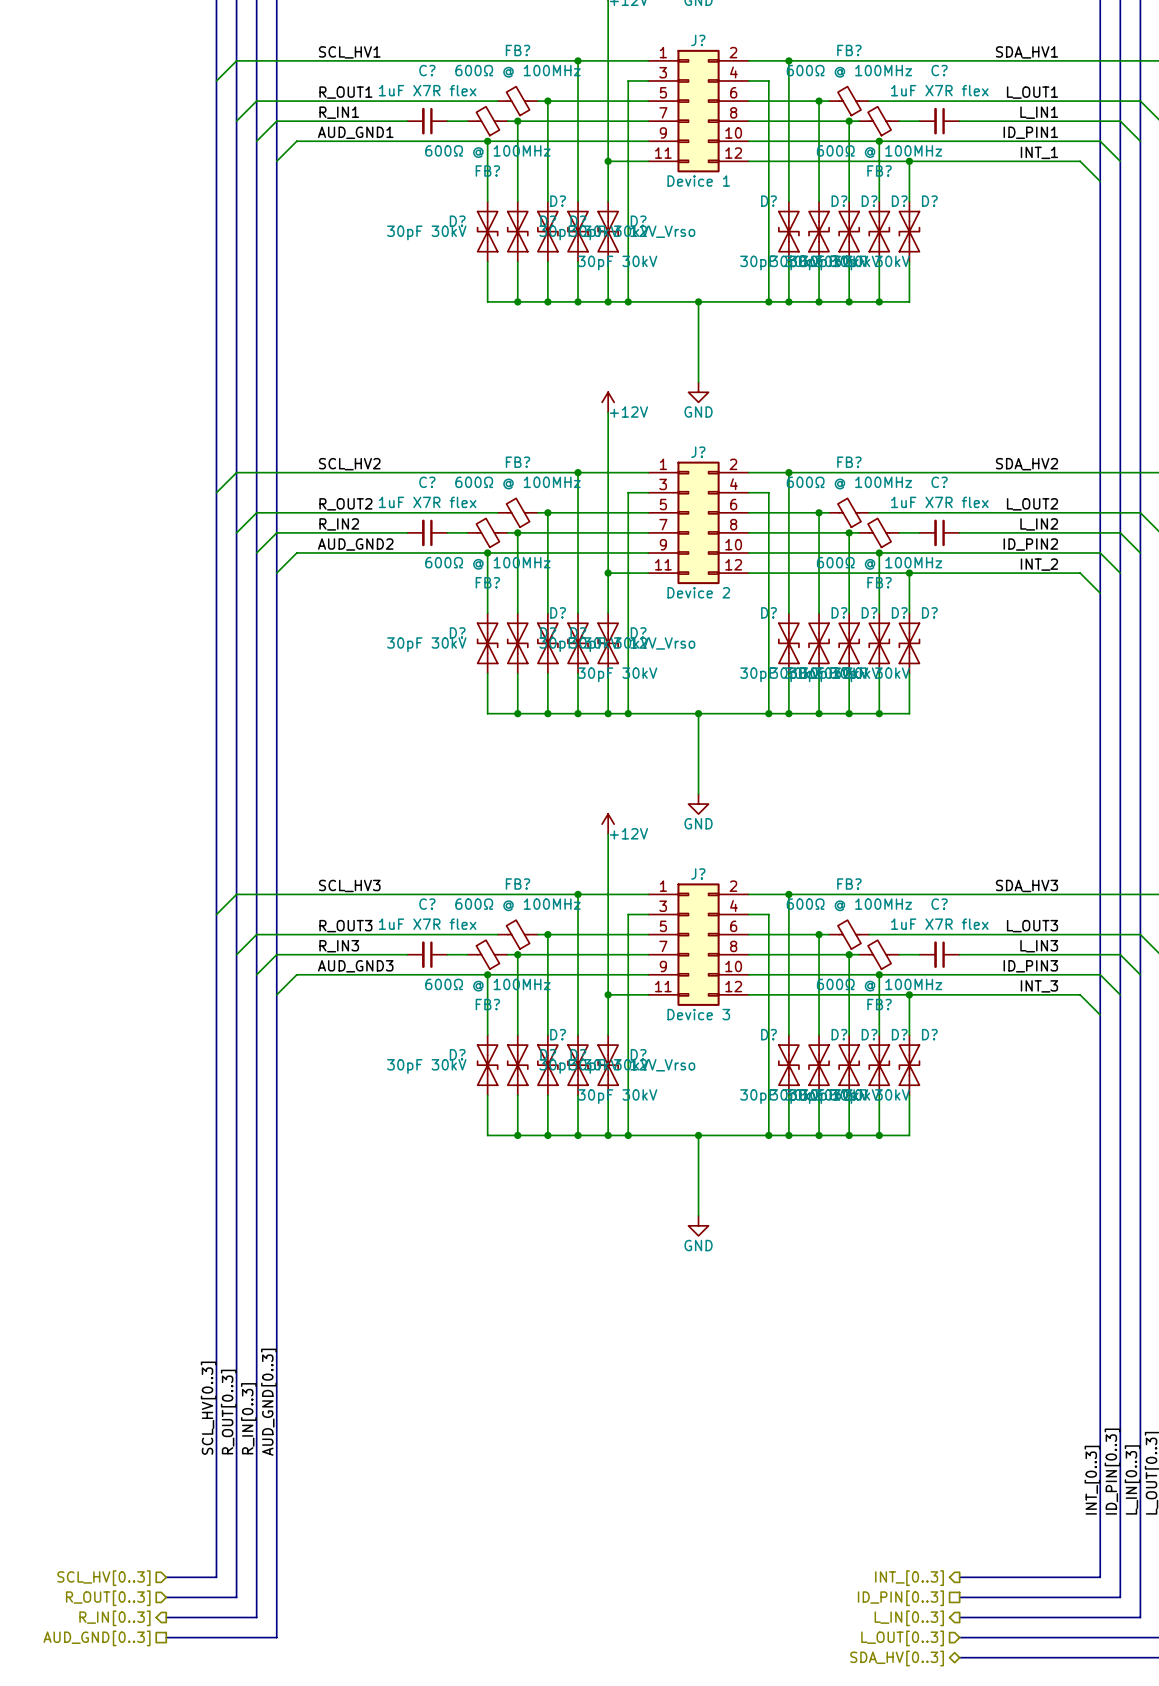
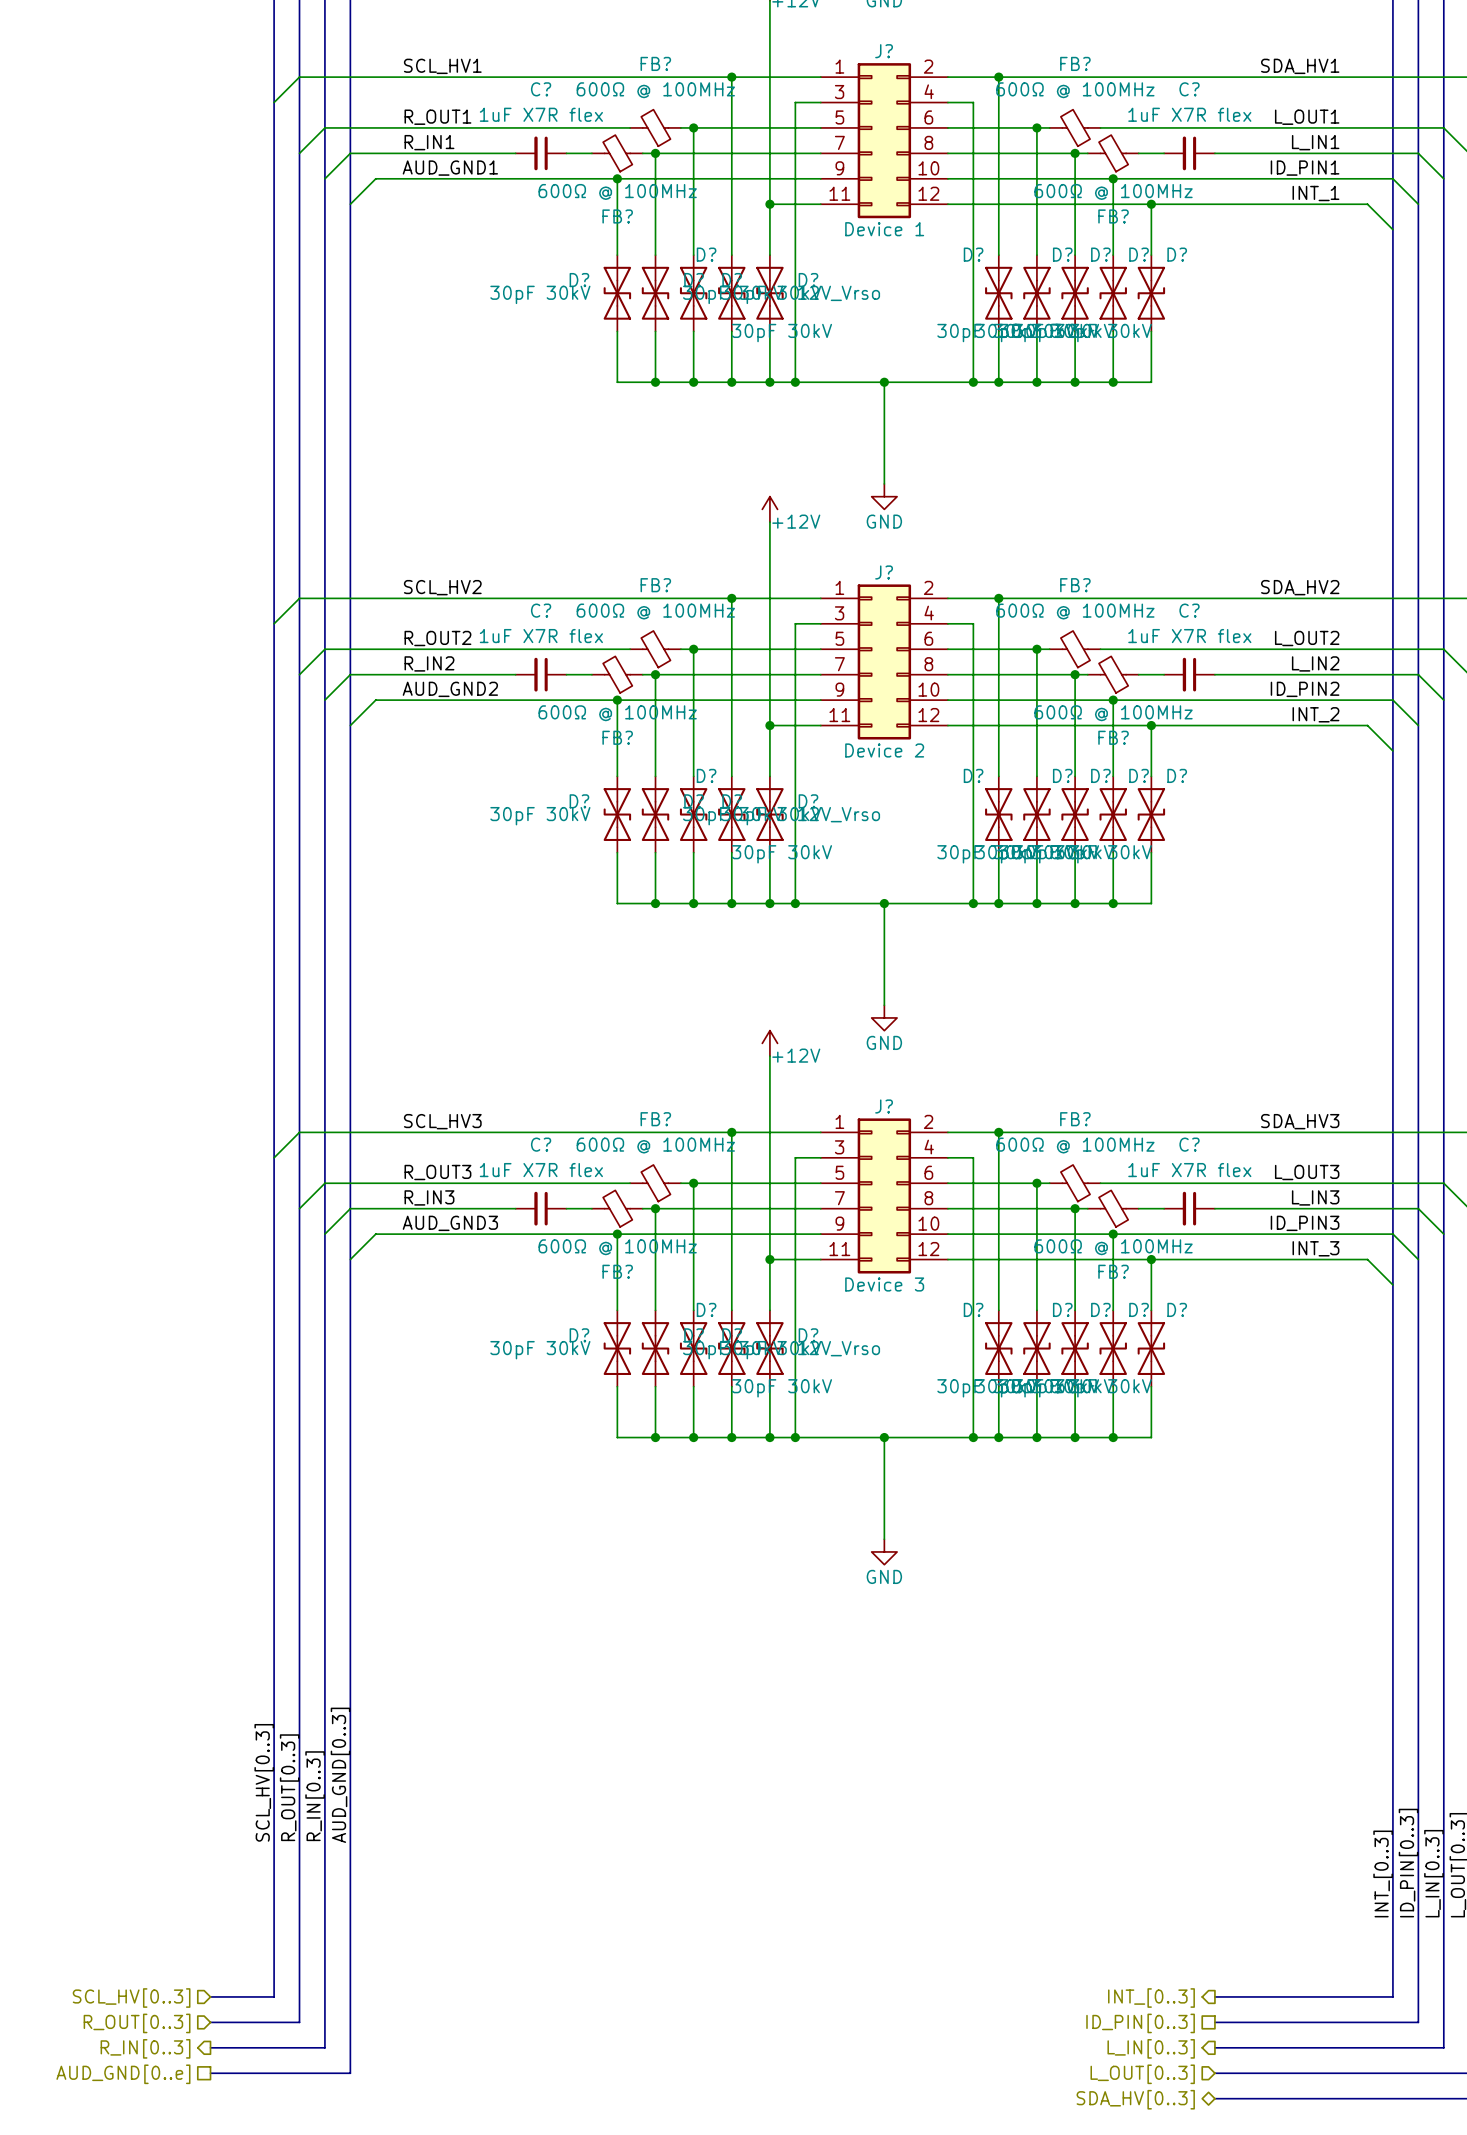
hierarchical label: AUD_GND[0..3] (97, 1638) -> AUD_GND[0..e] (123, 2074)

